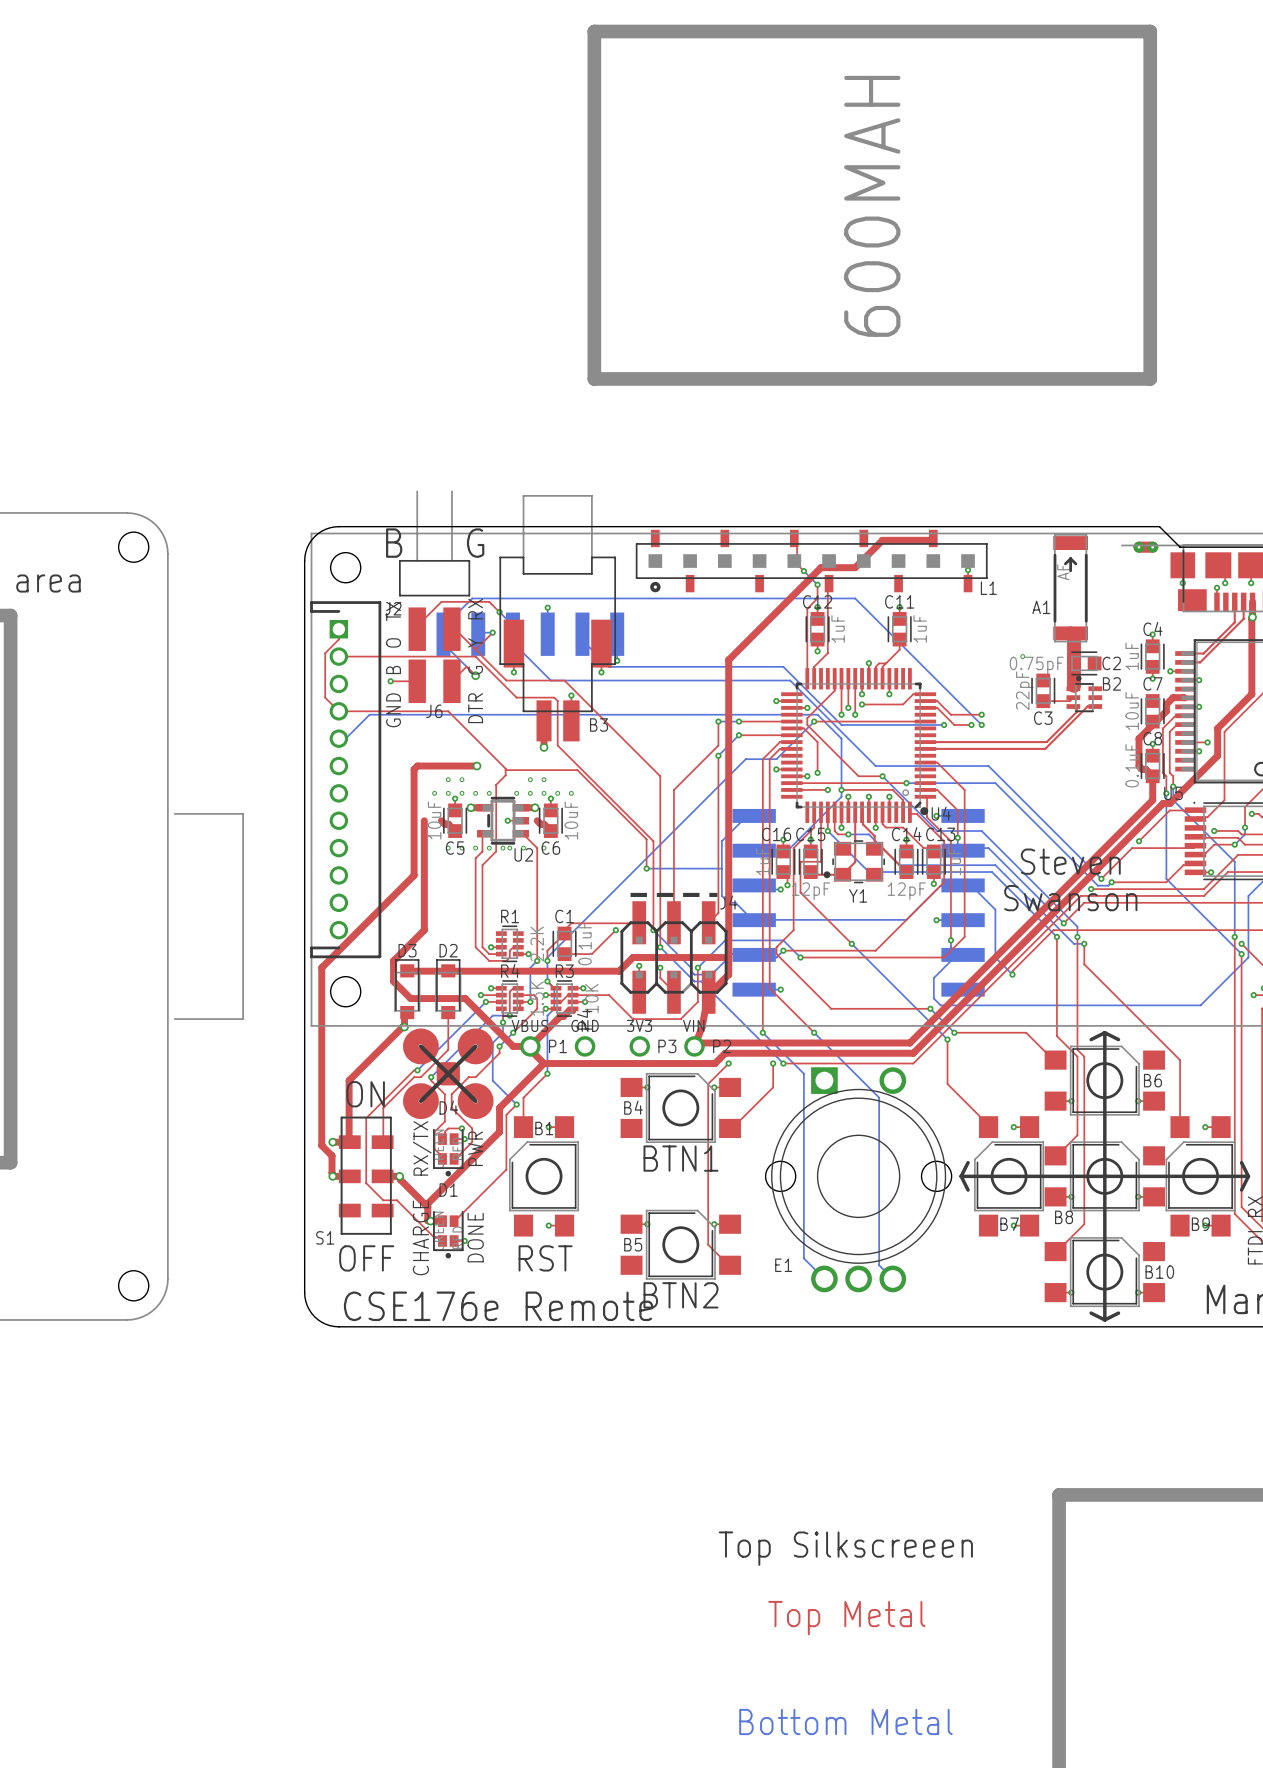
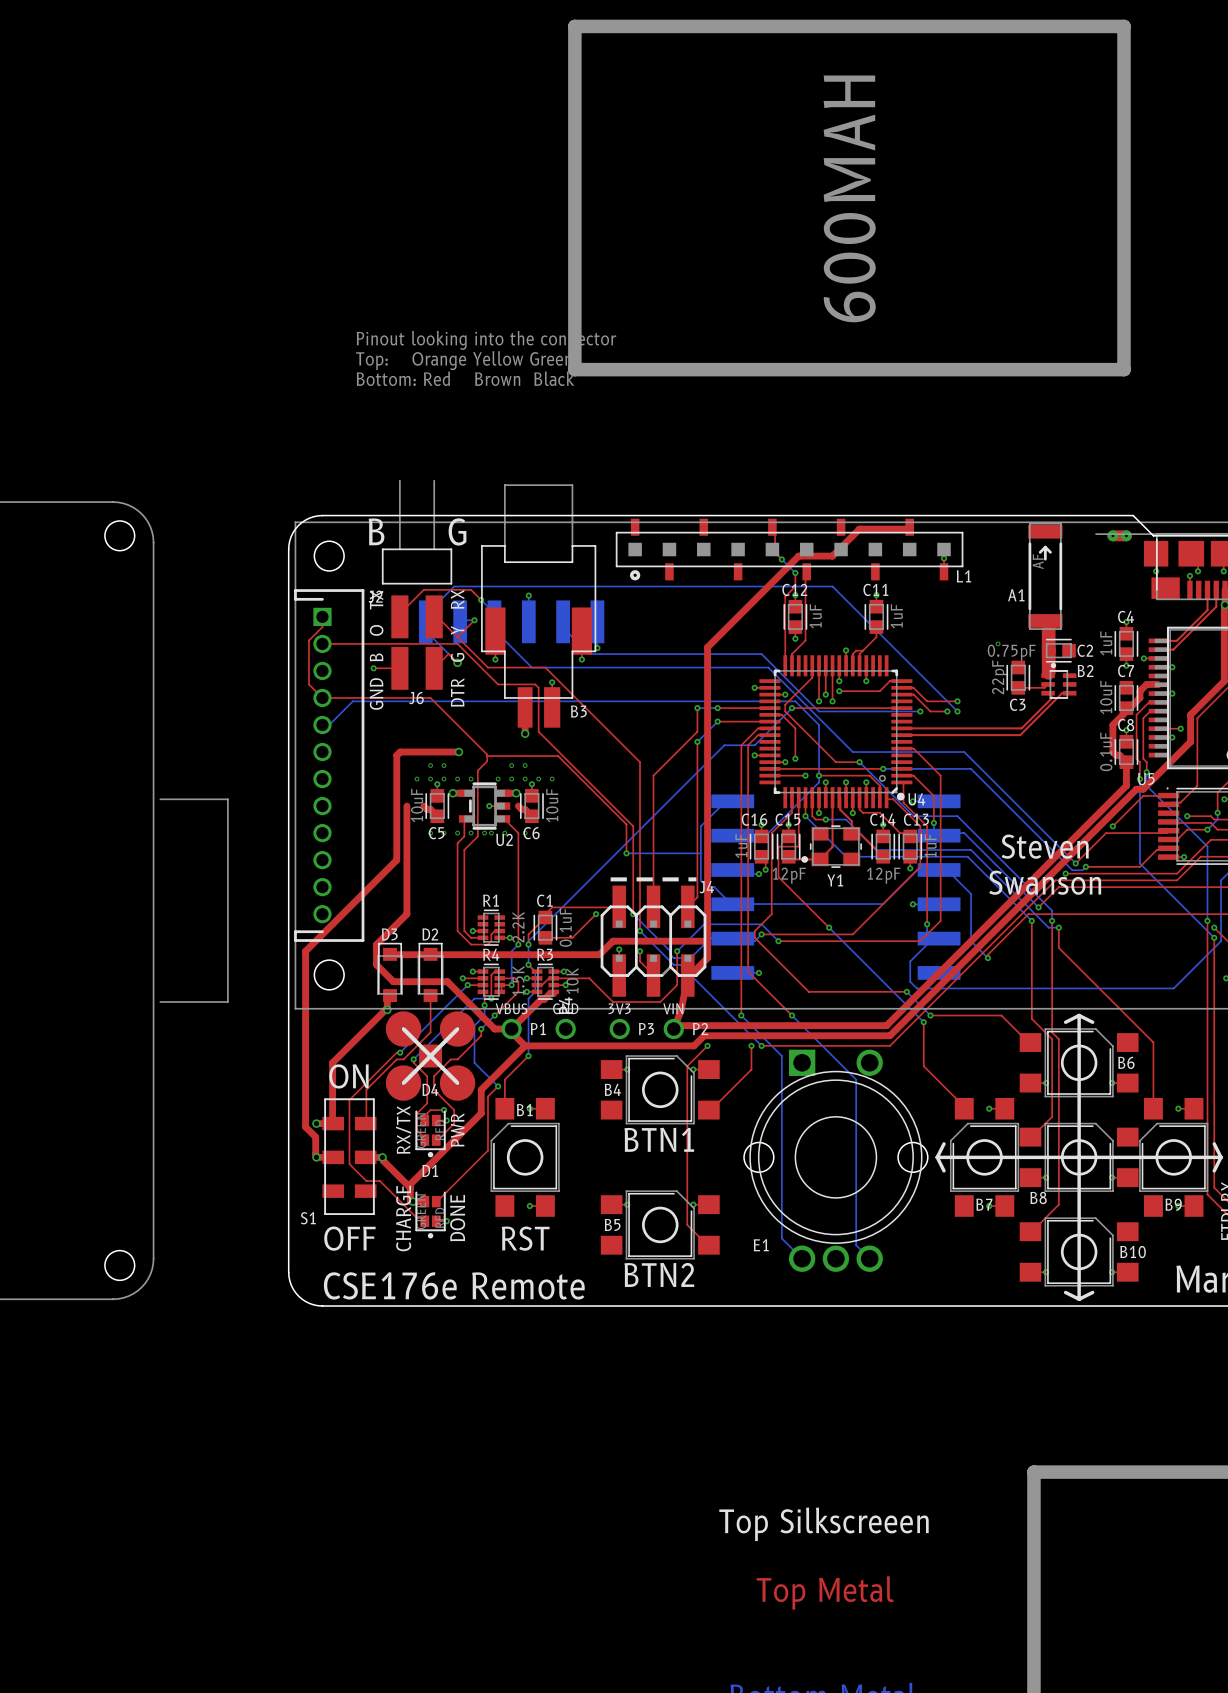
text: none -> Pinout looking into the connector (486, 340)
text: none -> Top: Orange Yellow Green (463, 360)
text: none -> Bottom: Red Brown Black (465, 378)

